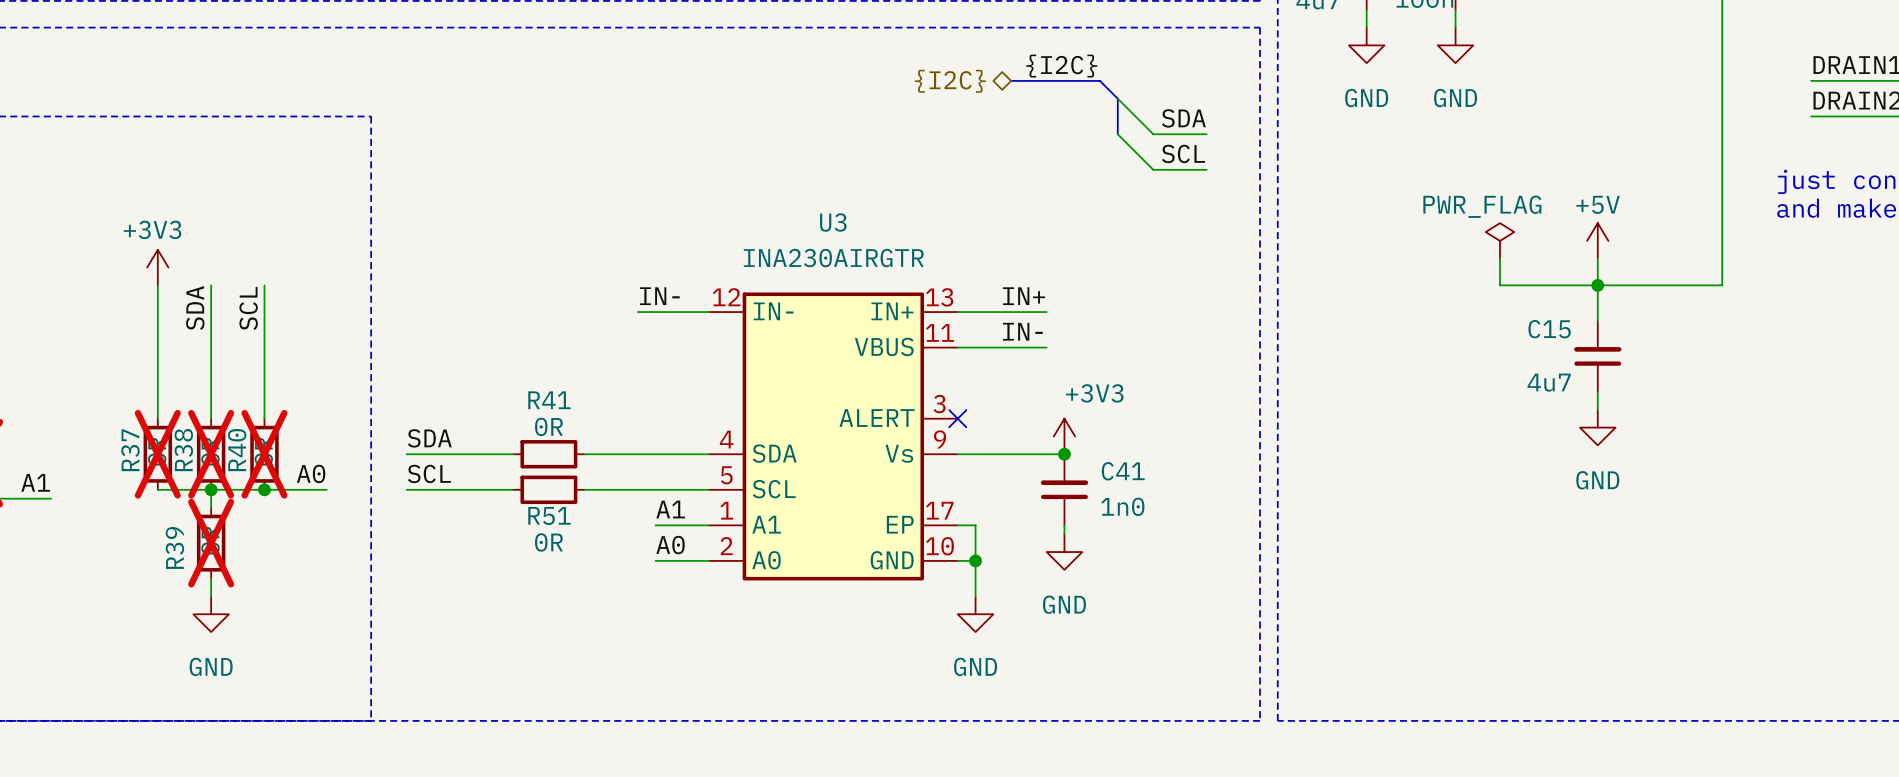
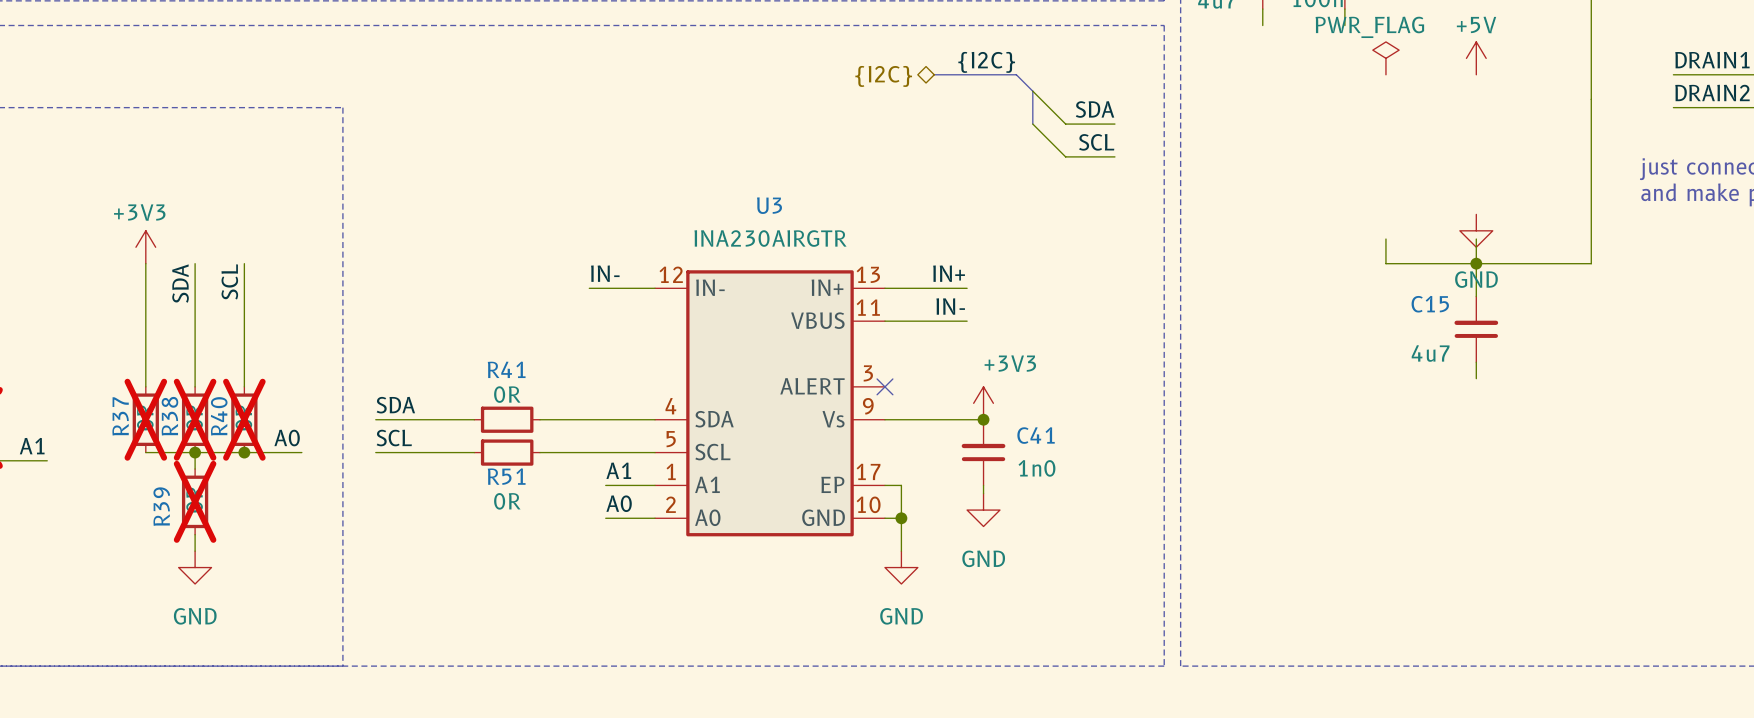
power symbol: GND (1366, 45) -> none
power symbol: GND (1455, 45) -> none
power symbol: none -> +5V (1476, 58)
power symbol position: PWR_FLAG (1500, 240) -> PWR_FLAG (1385, 58)
power symbol: +5V (1597, 240) -> GND (1476, 230)
power symbol: GND (1597, 427) -> none

